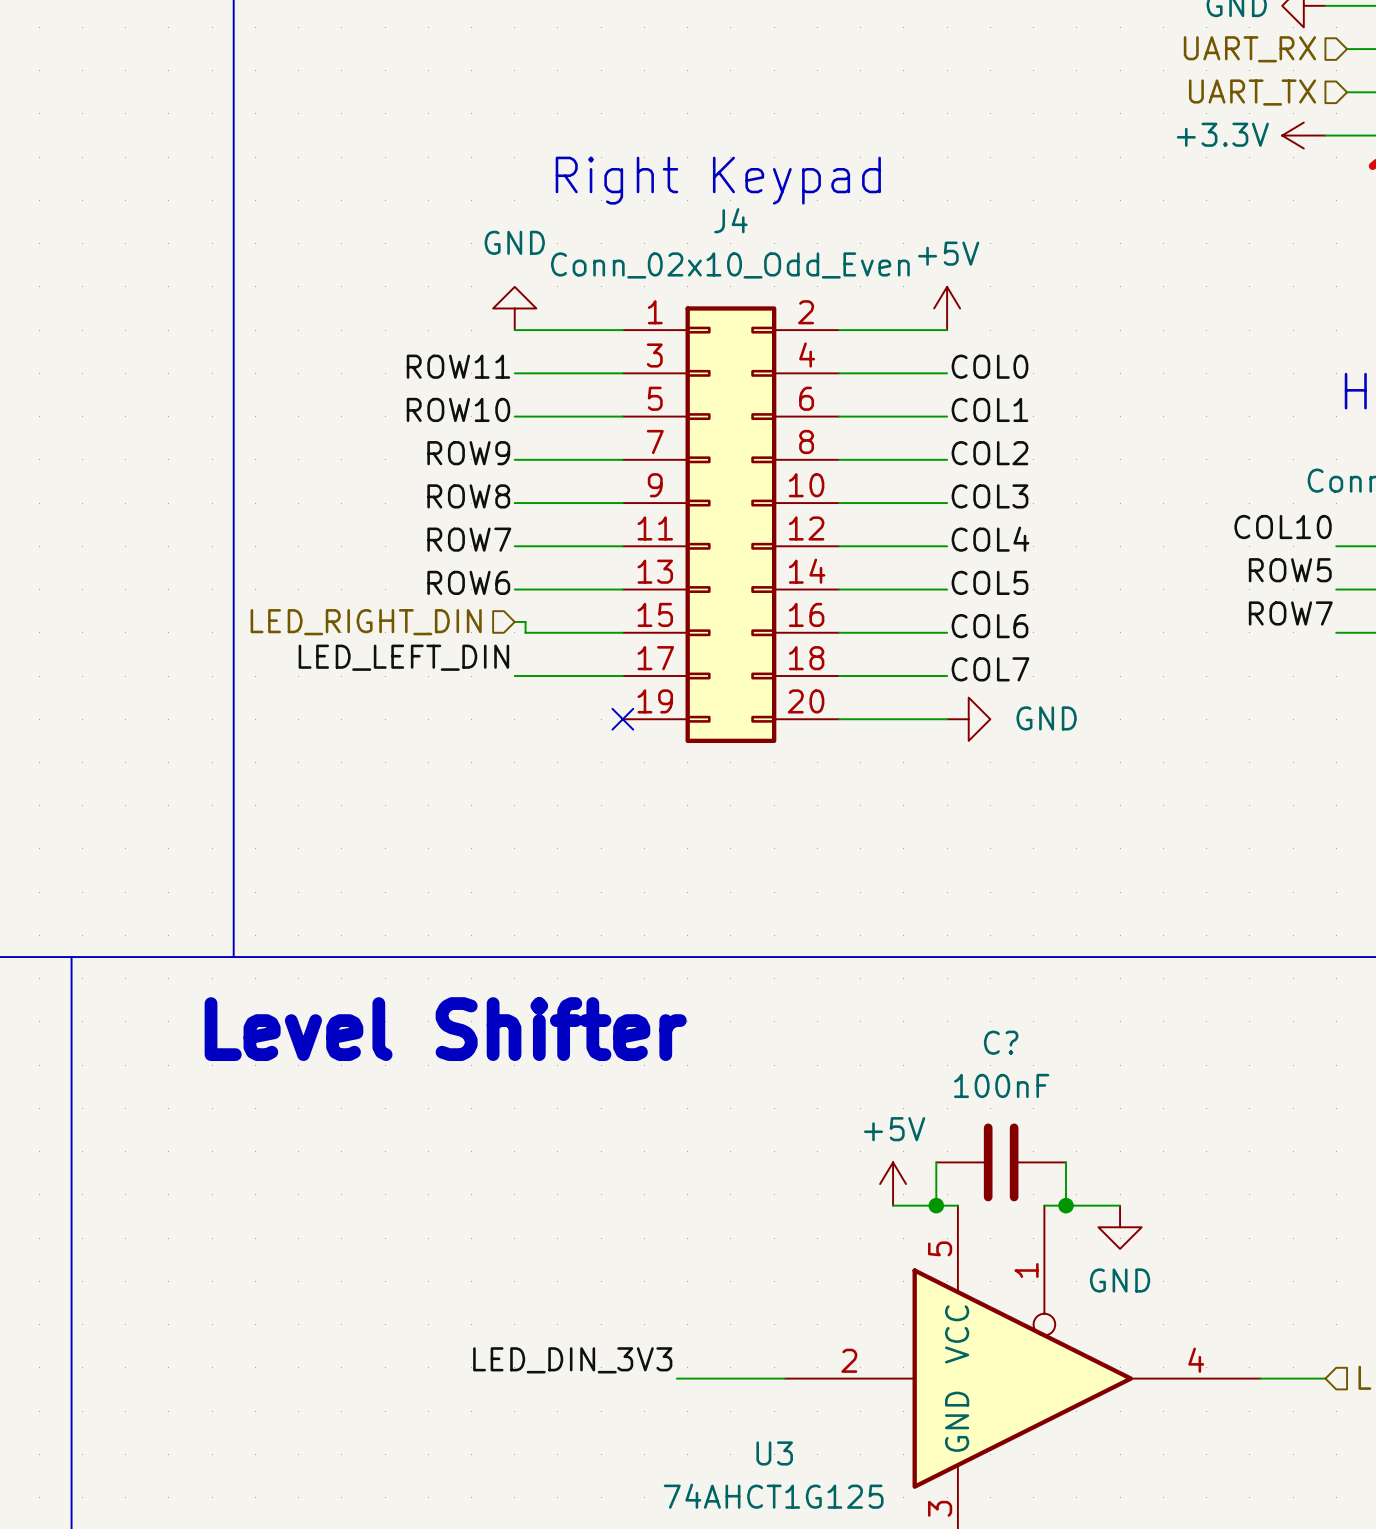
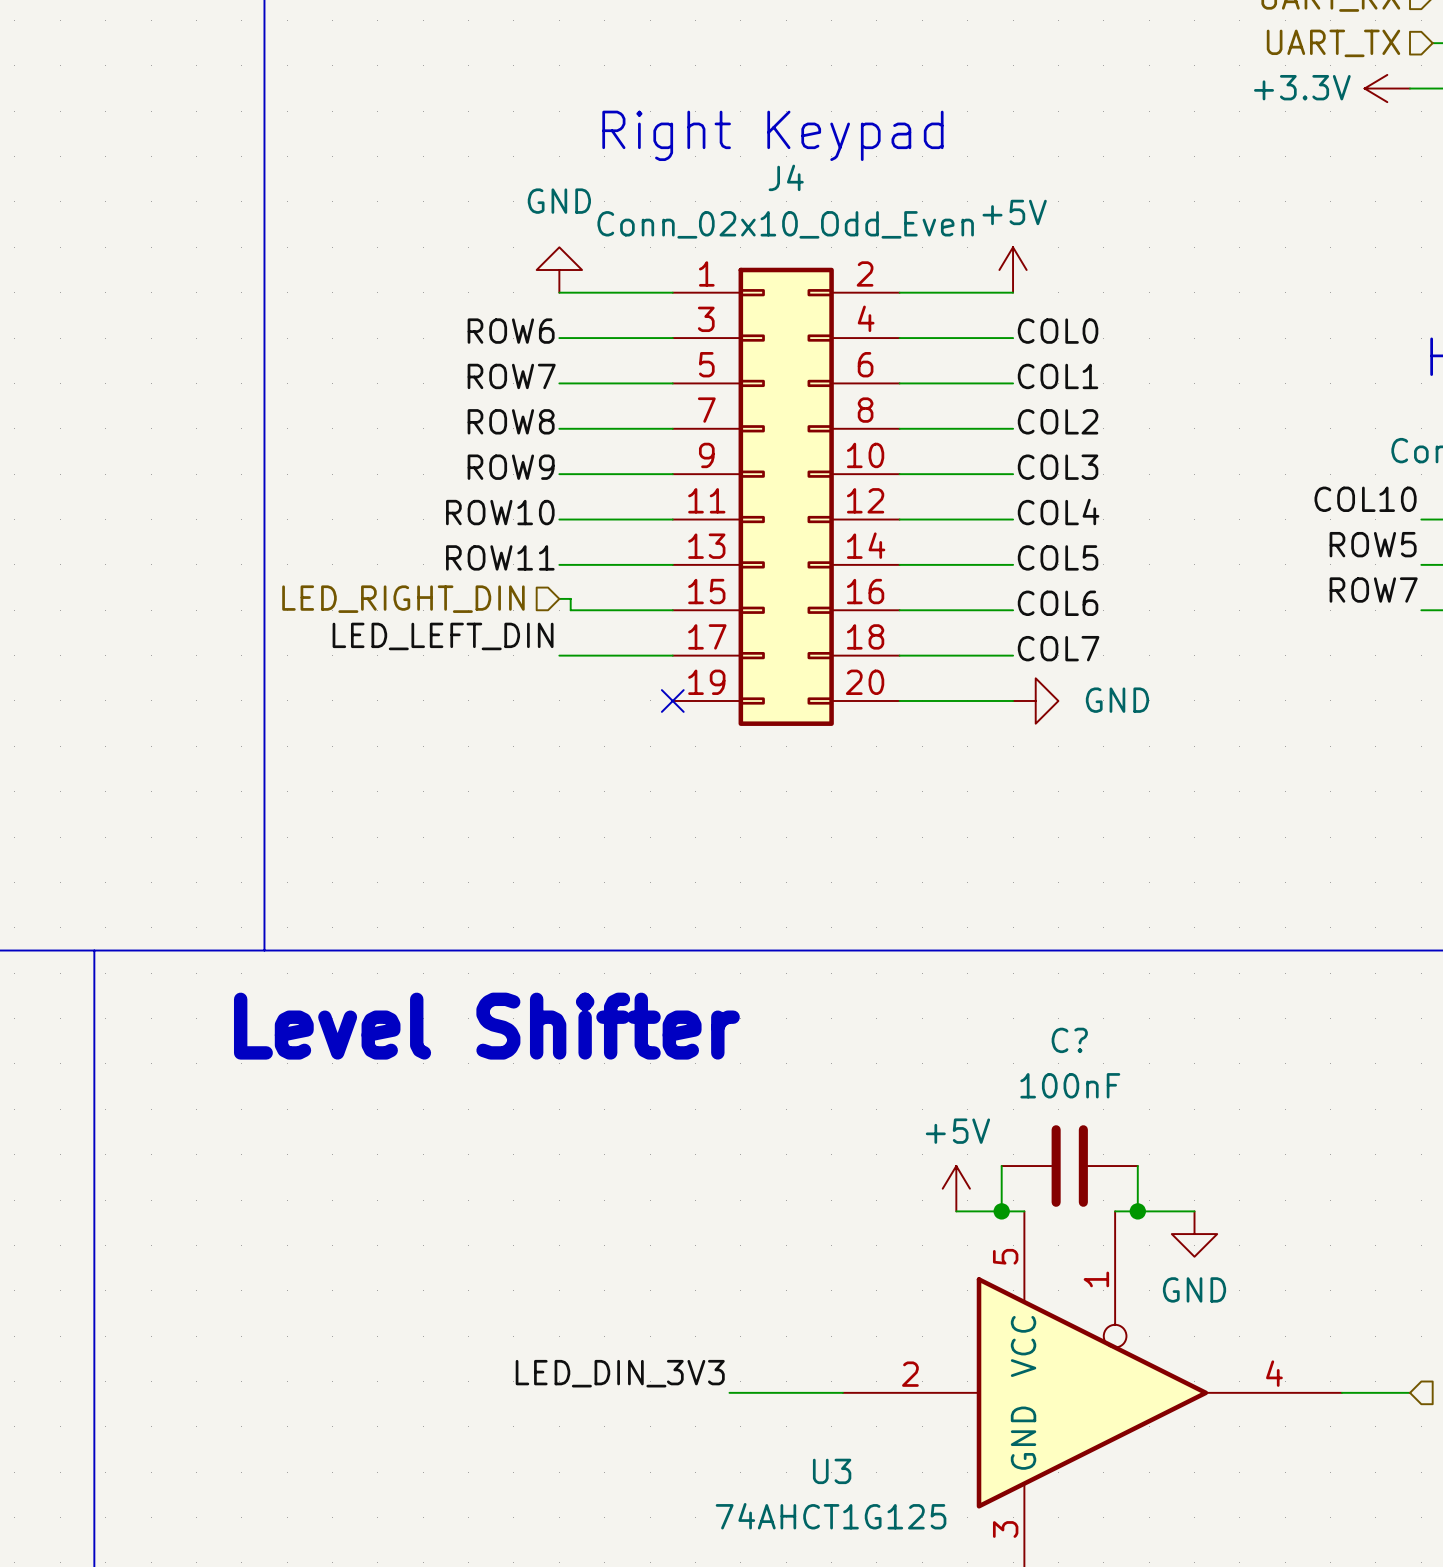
label: ROW11 (458, 366) -> ROW6 (511, 331)
label: ROW10 (458, 409) -> ROW7 (511, 376)
label: ROW9 (468, 453) -> ROW8 (511, 421)
label: ROW8 (468, 496) -> ROW9 (511, 467)
label: ROW7 (469, 539) -> ROW10 (500, 512)
label: ROW6 (468, 582) -> ROW11 (500, 557)

